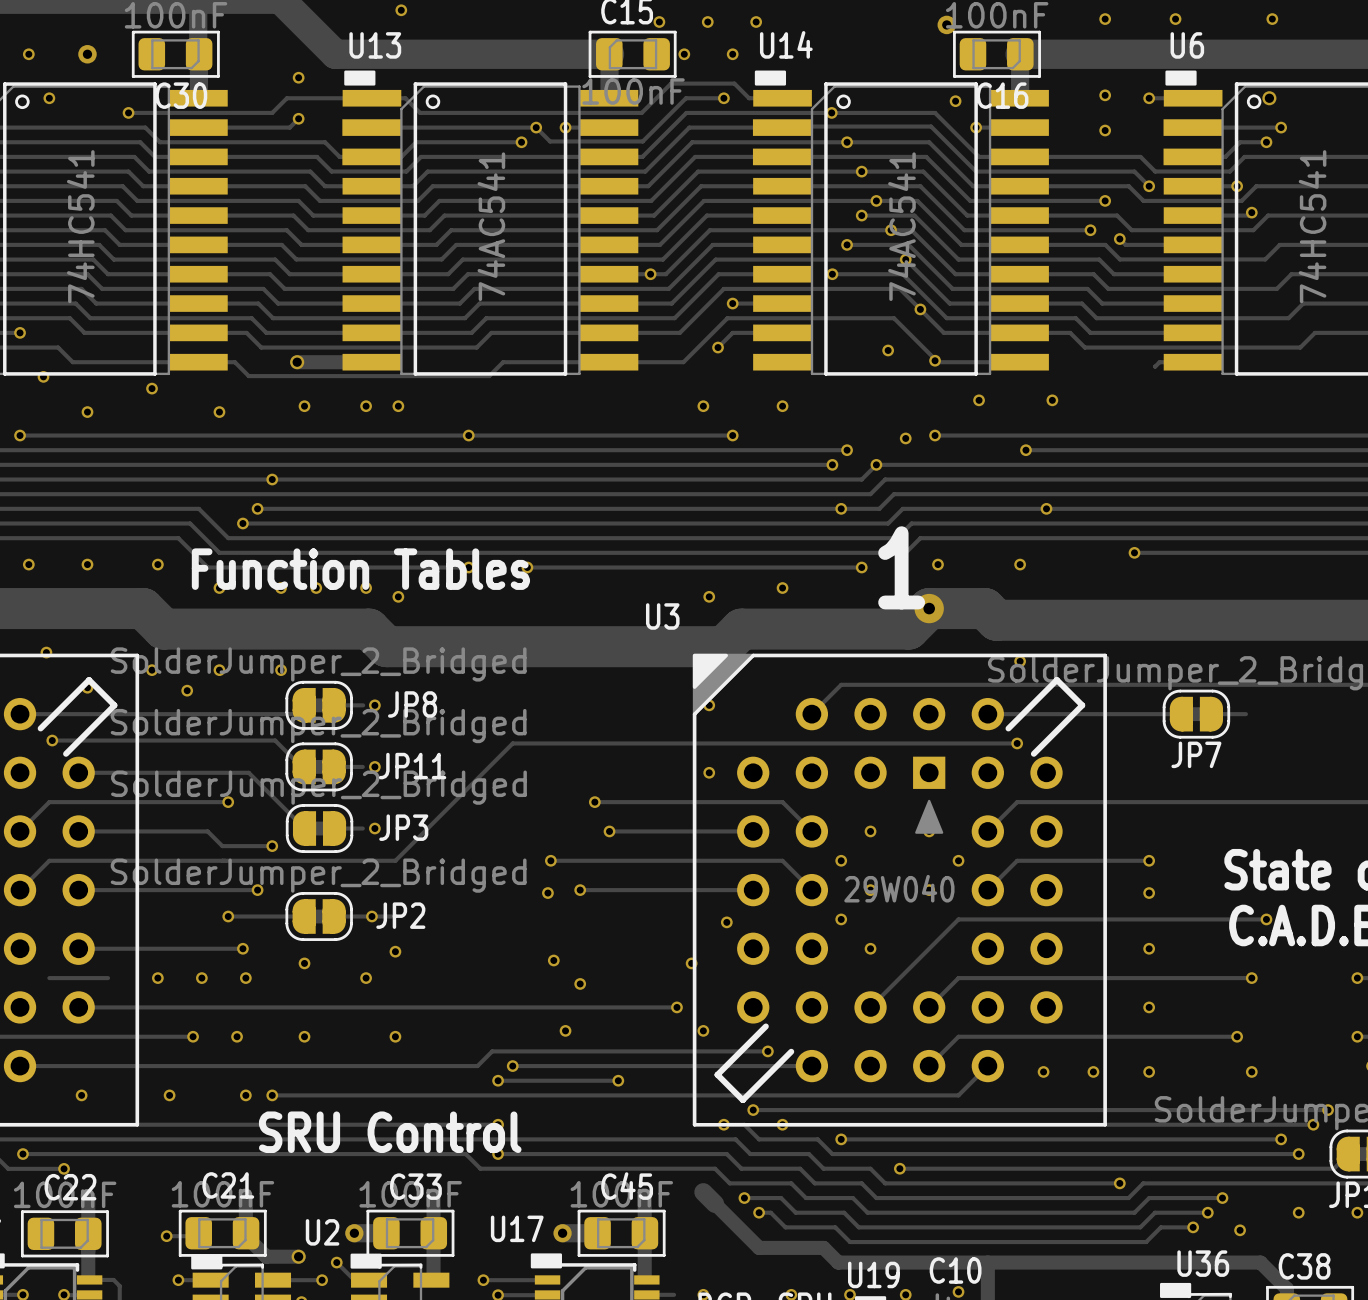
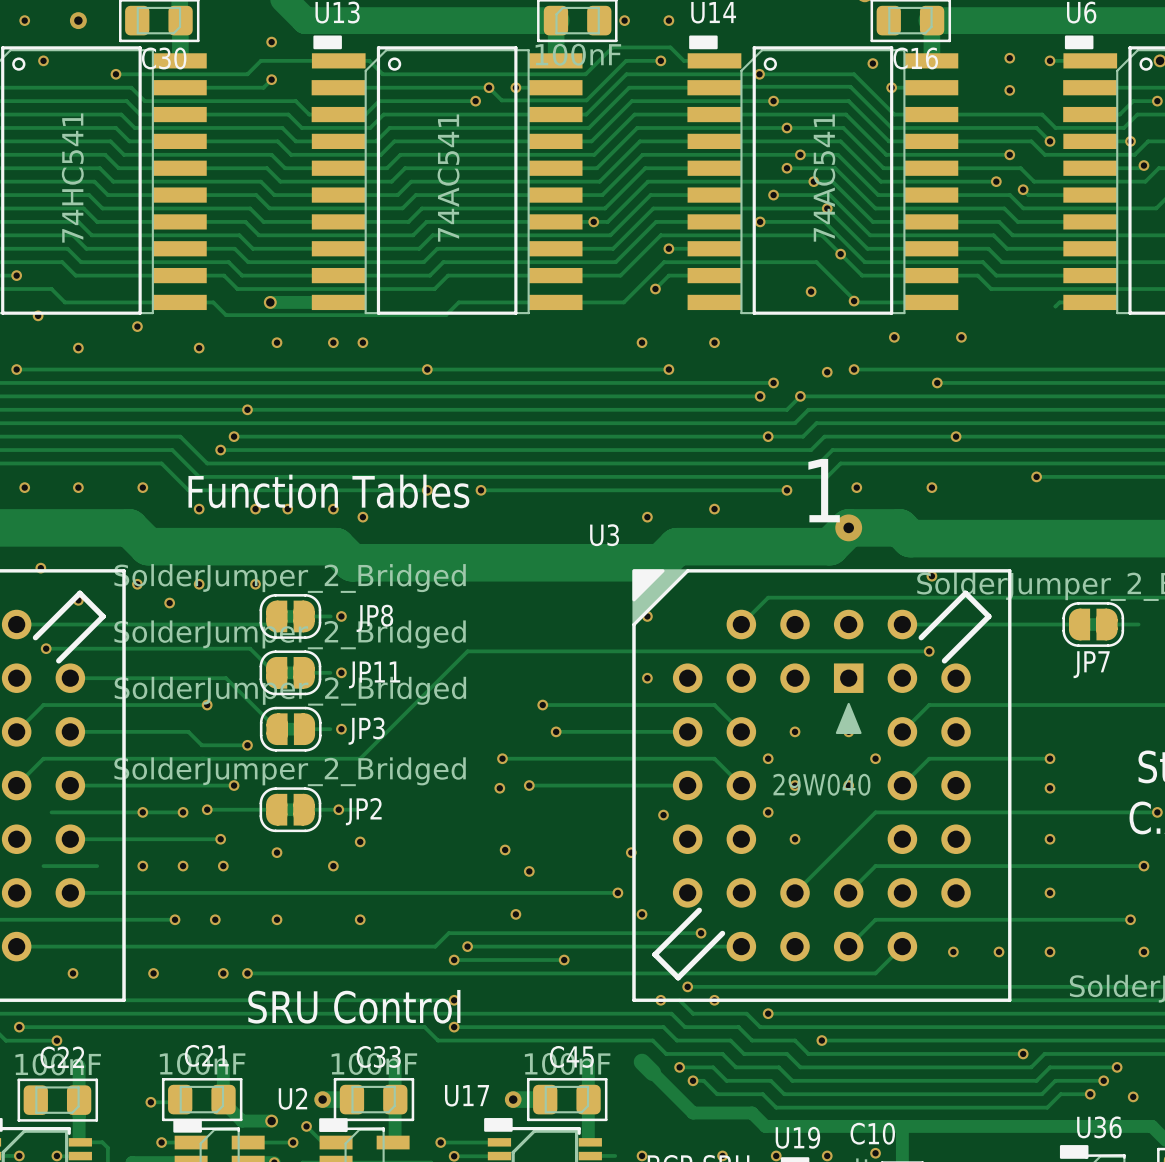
track: none -> (51, 812) (180, 812)
via: none -> (142, 812)
via: none -> (183, 812)

